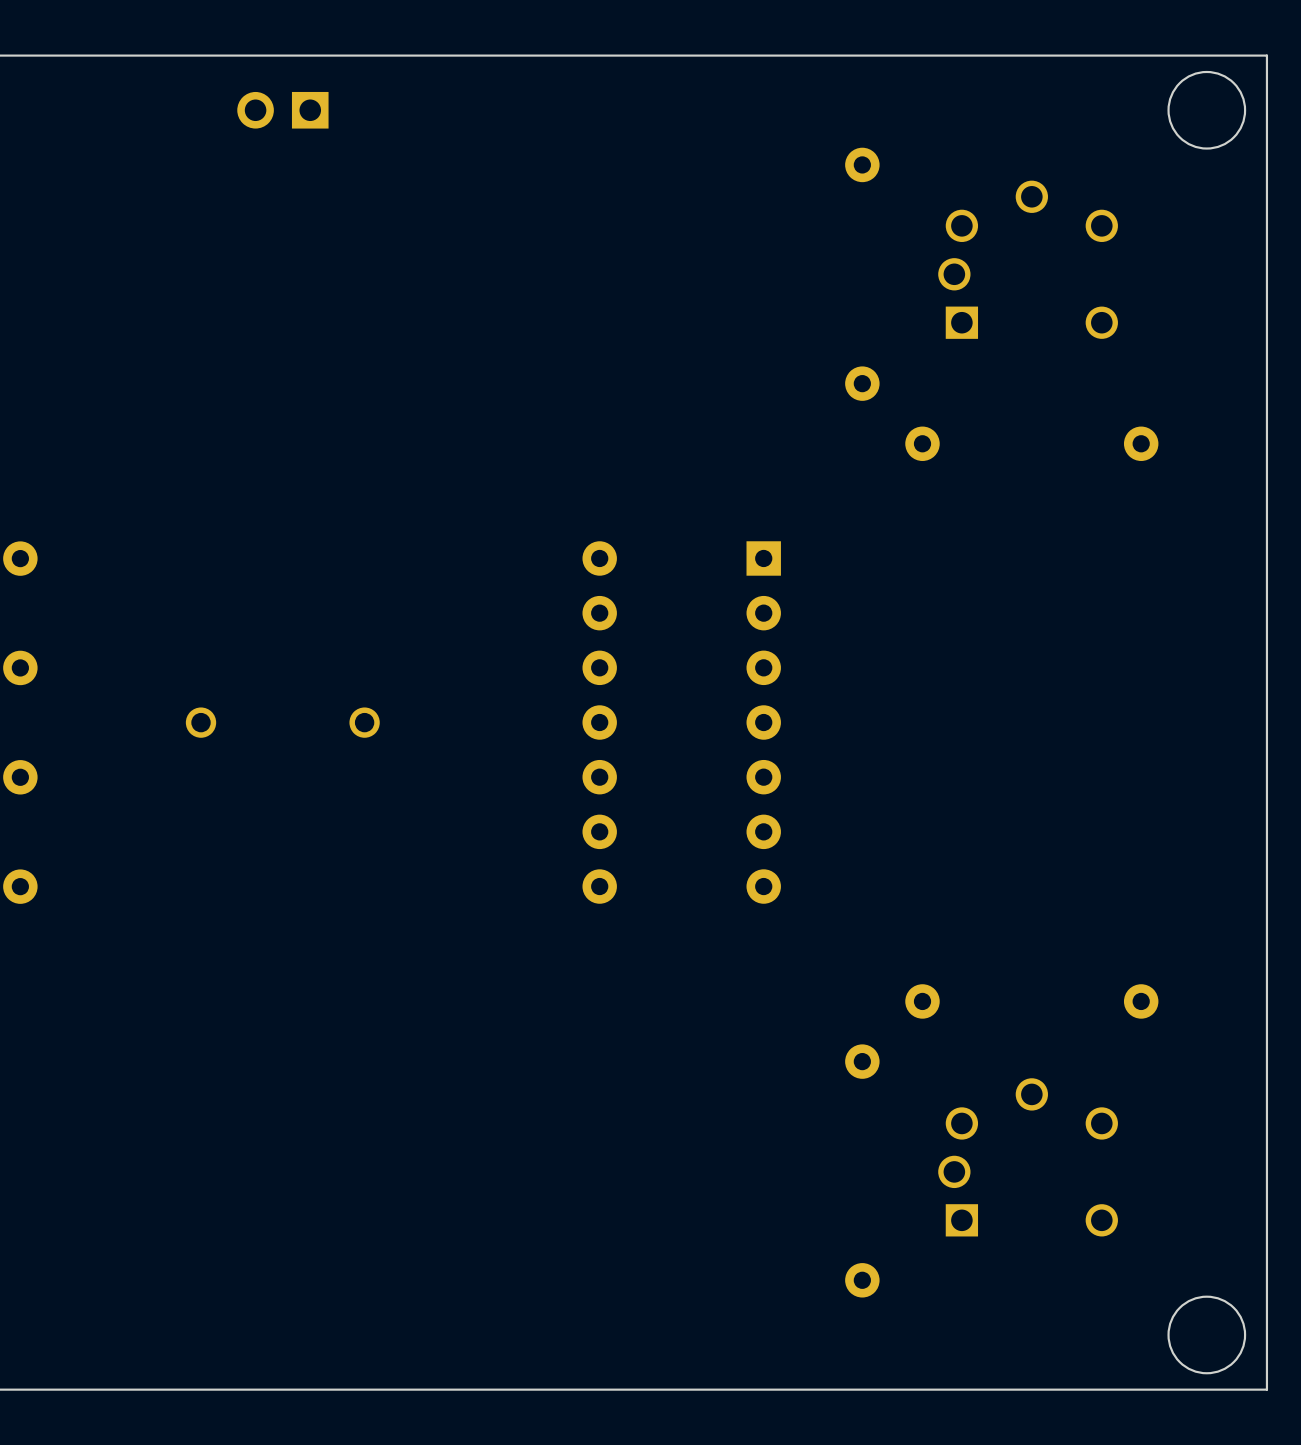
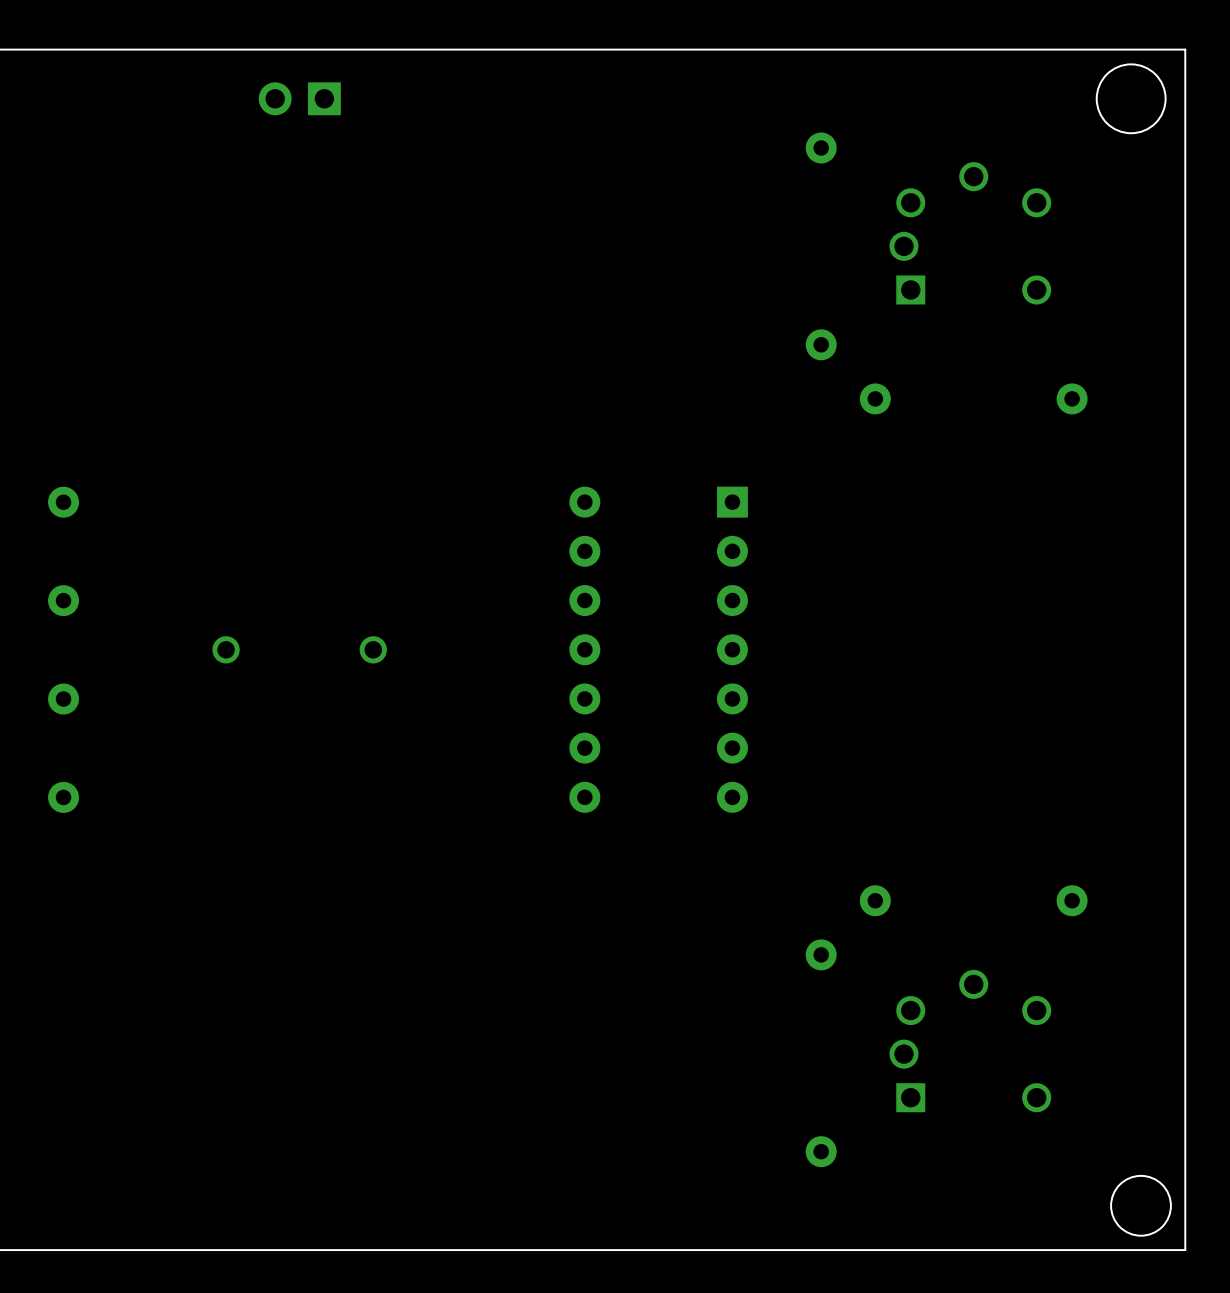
round board edge size: [1167, 1295, 1247, 1375] -> [1110, 1174, 1172, 1237]

